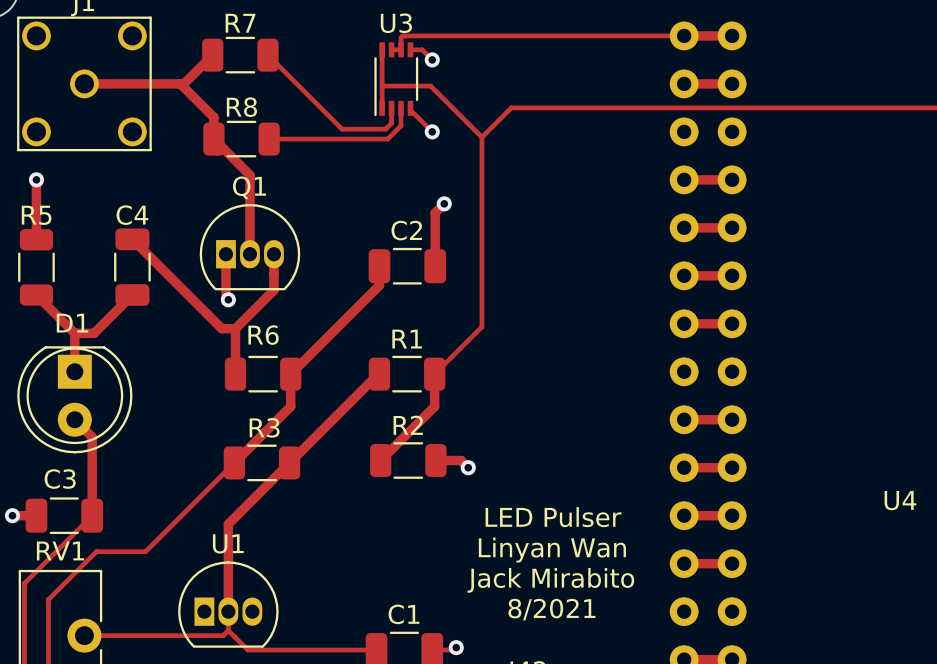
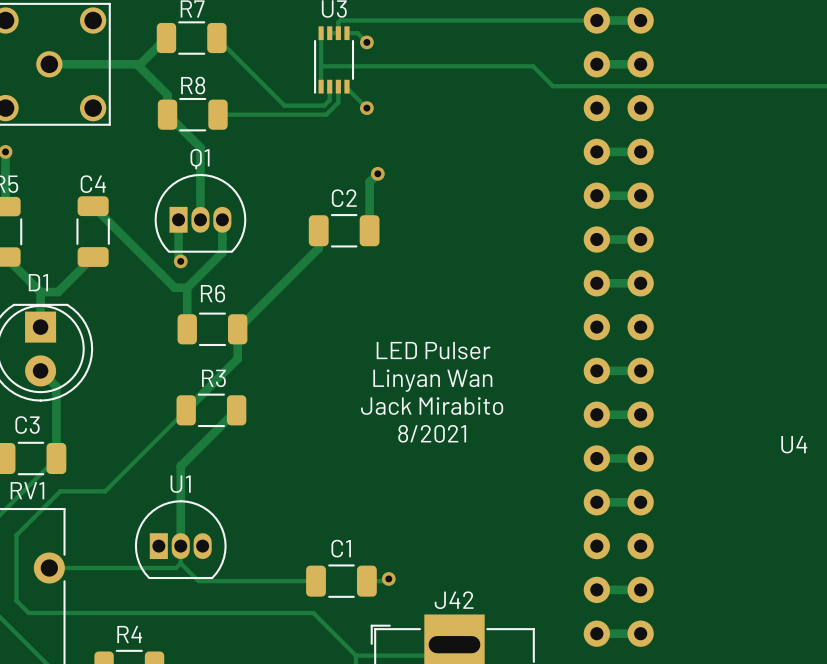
track: (430, 86) (481, 137) -> none
track: (636, 107) (511, 107) (481, 137) -> (553, 86) (533, 66) (365, 66)
track: (481, 137) (481, 326) (434, 374) (434, 406) (380, 460) -> none
track: (379, 374) (289, 462) -> none
R1: (407, 374) -> none
R2: (408, 460) -> none
track: (435, 460) (461, 460) (468, 467) -> none
via: (468, 467) -> none
text position: LED Pulser (553, 517) -> LED Pulser (433, 350)
text position: Linyan Wan (552, 550) -> Linyan Wan (432, 380)
text position: Jack Mirabito (550, 580) -> Jack Mirabito (432, 406)
text position: 8/2021 (551, 609) -> 8/2021 (432, 433)

